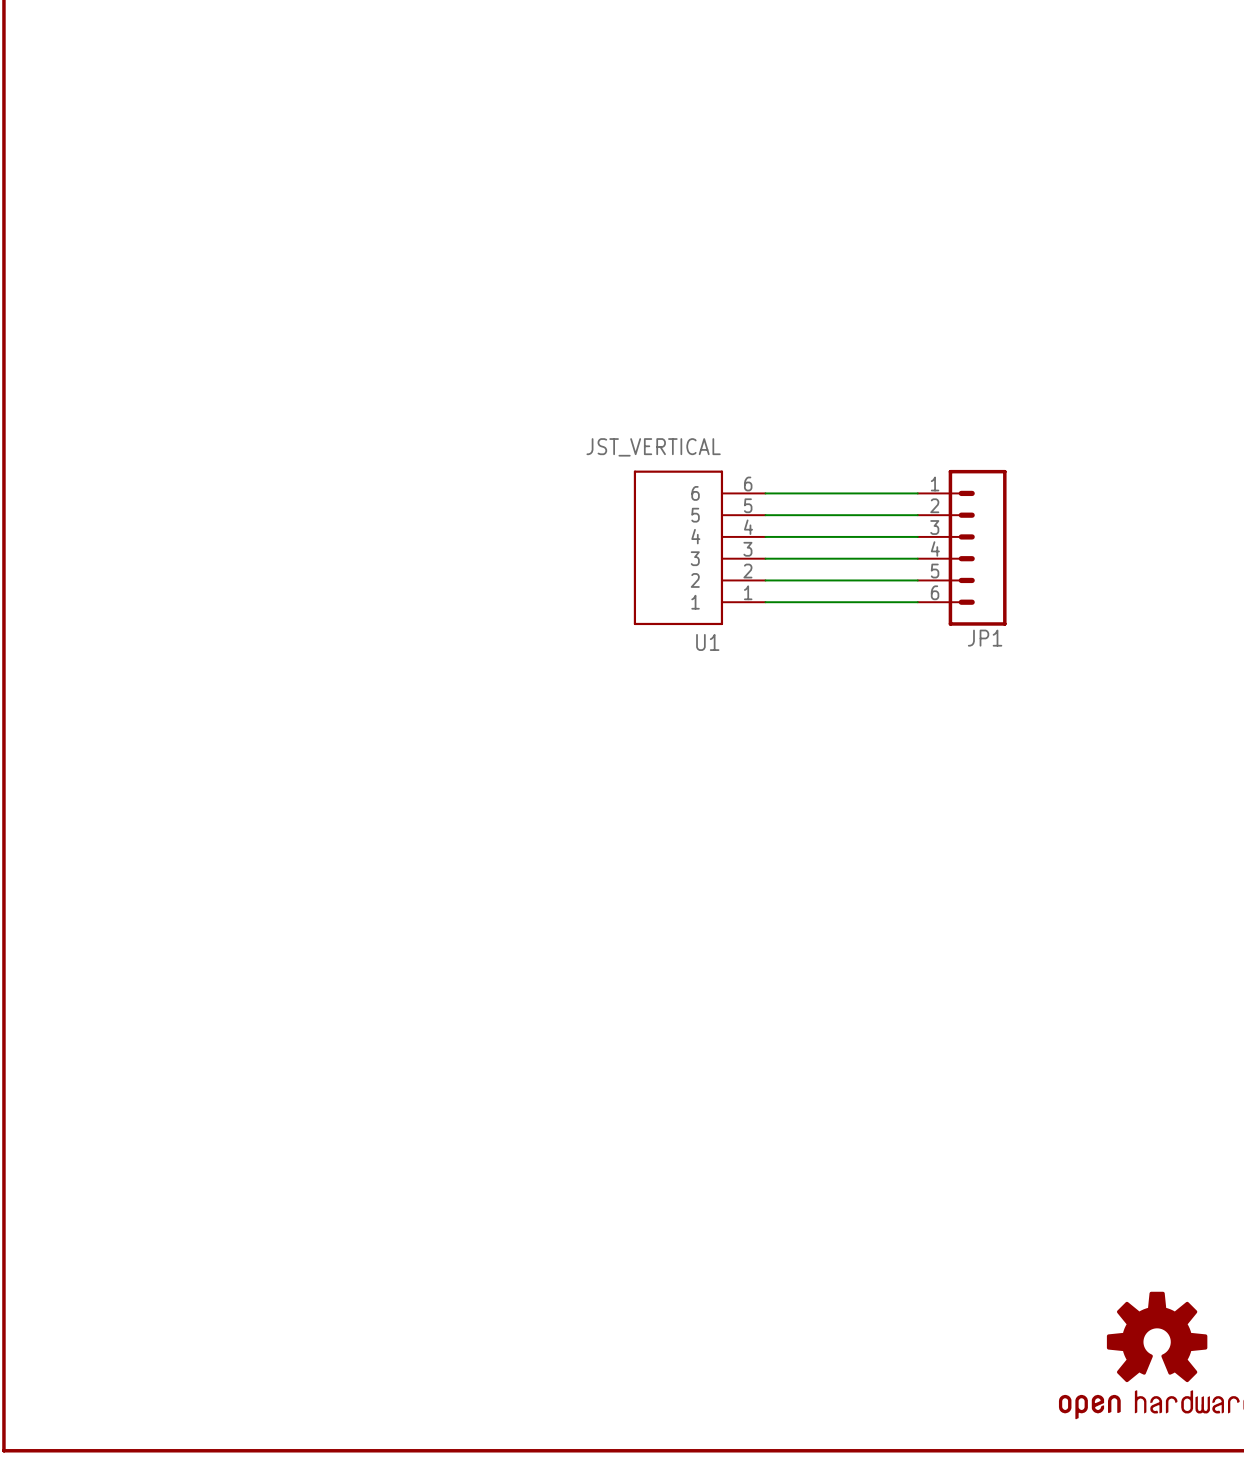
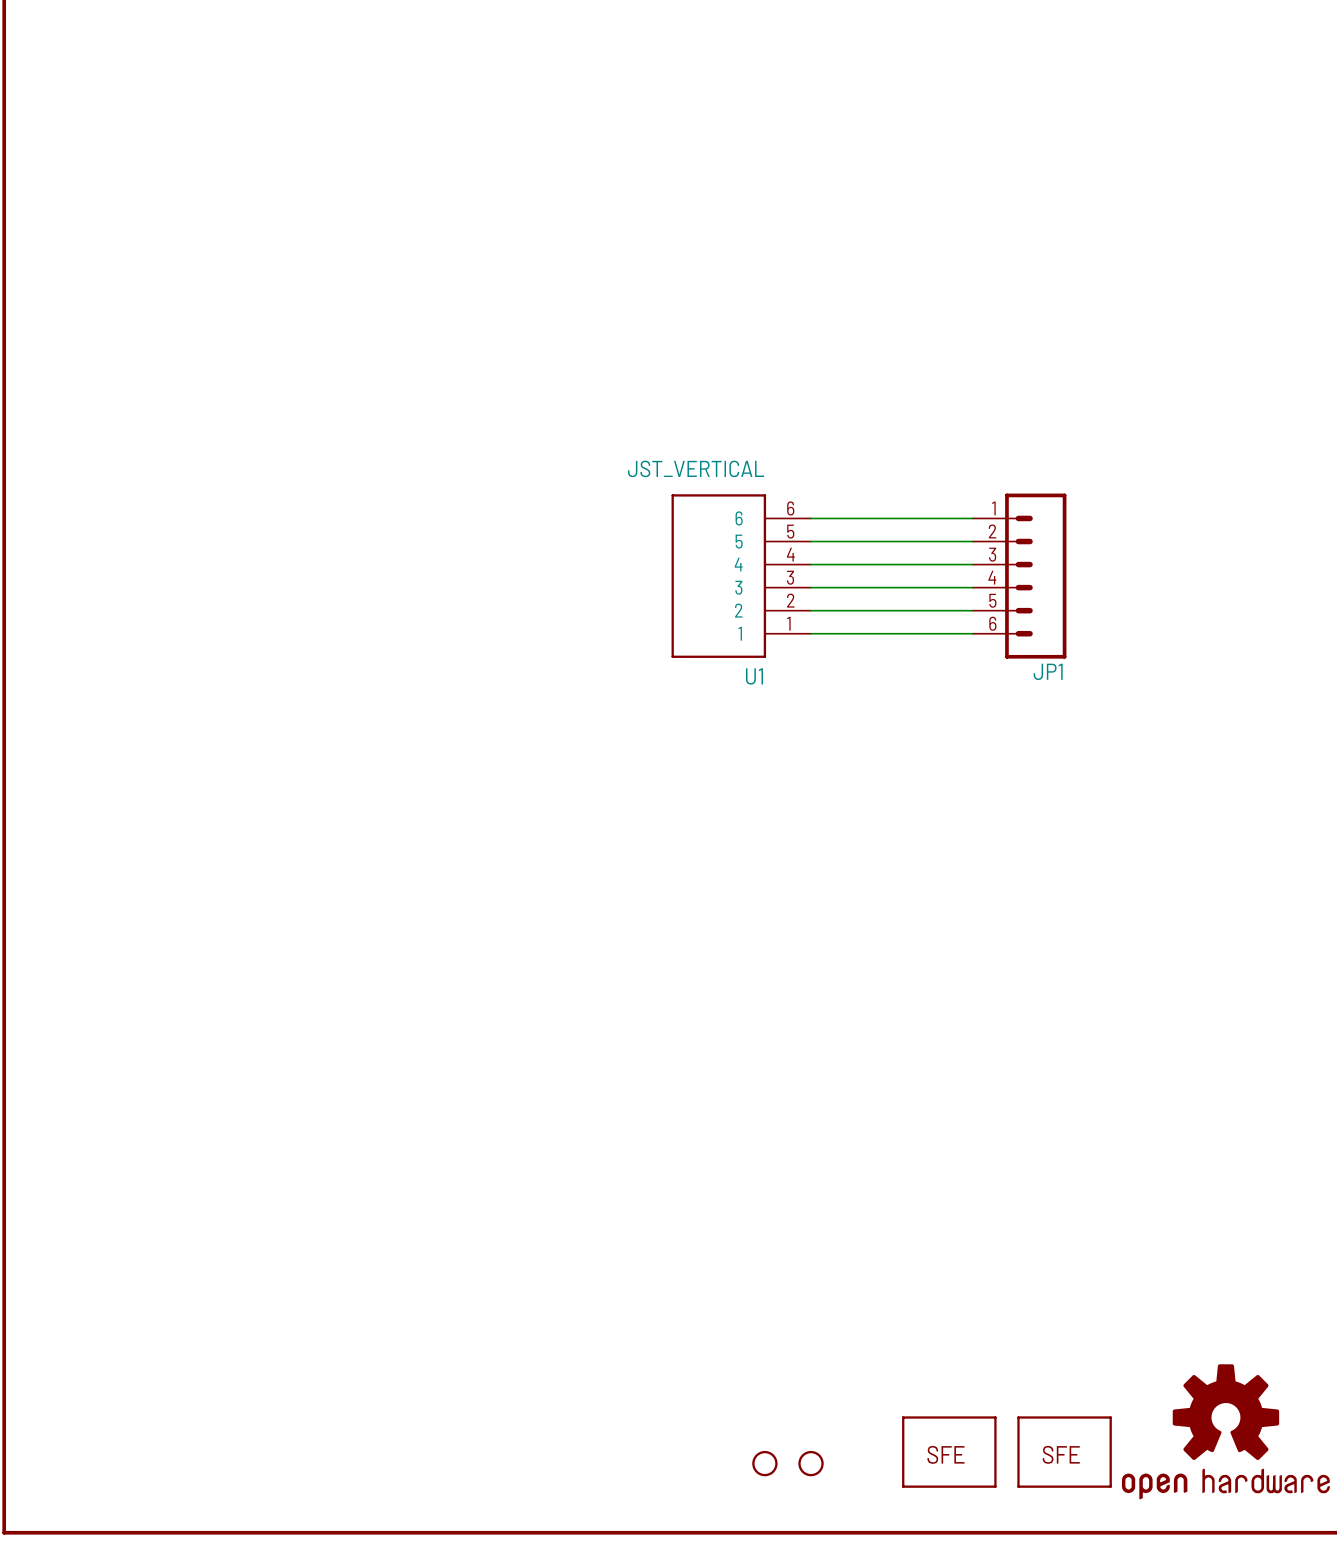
part: none -> (949, 1452)
part: none -> (1064, 1452)
part: none -> (764, 1463)
part: none -> (811, 1463)

